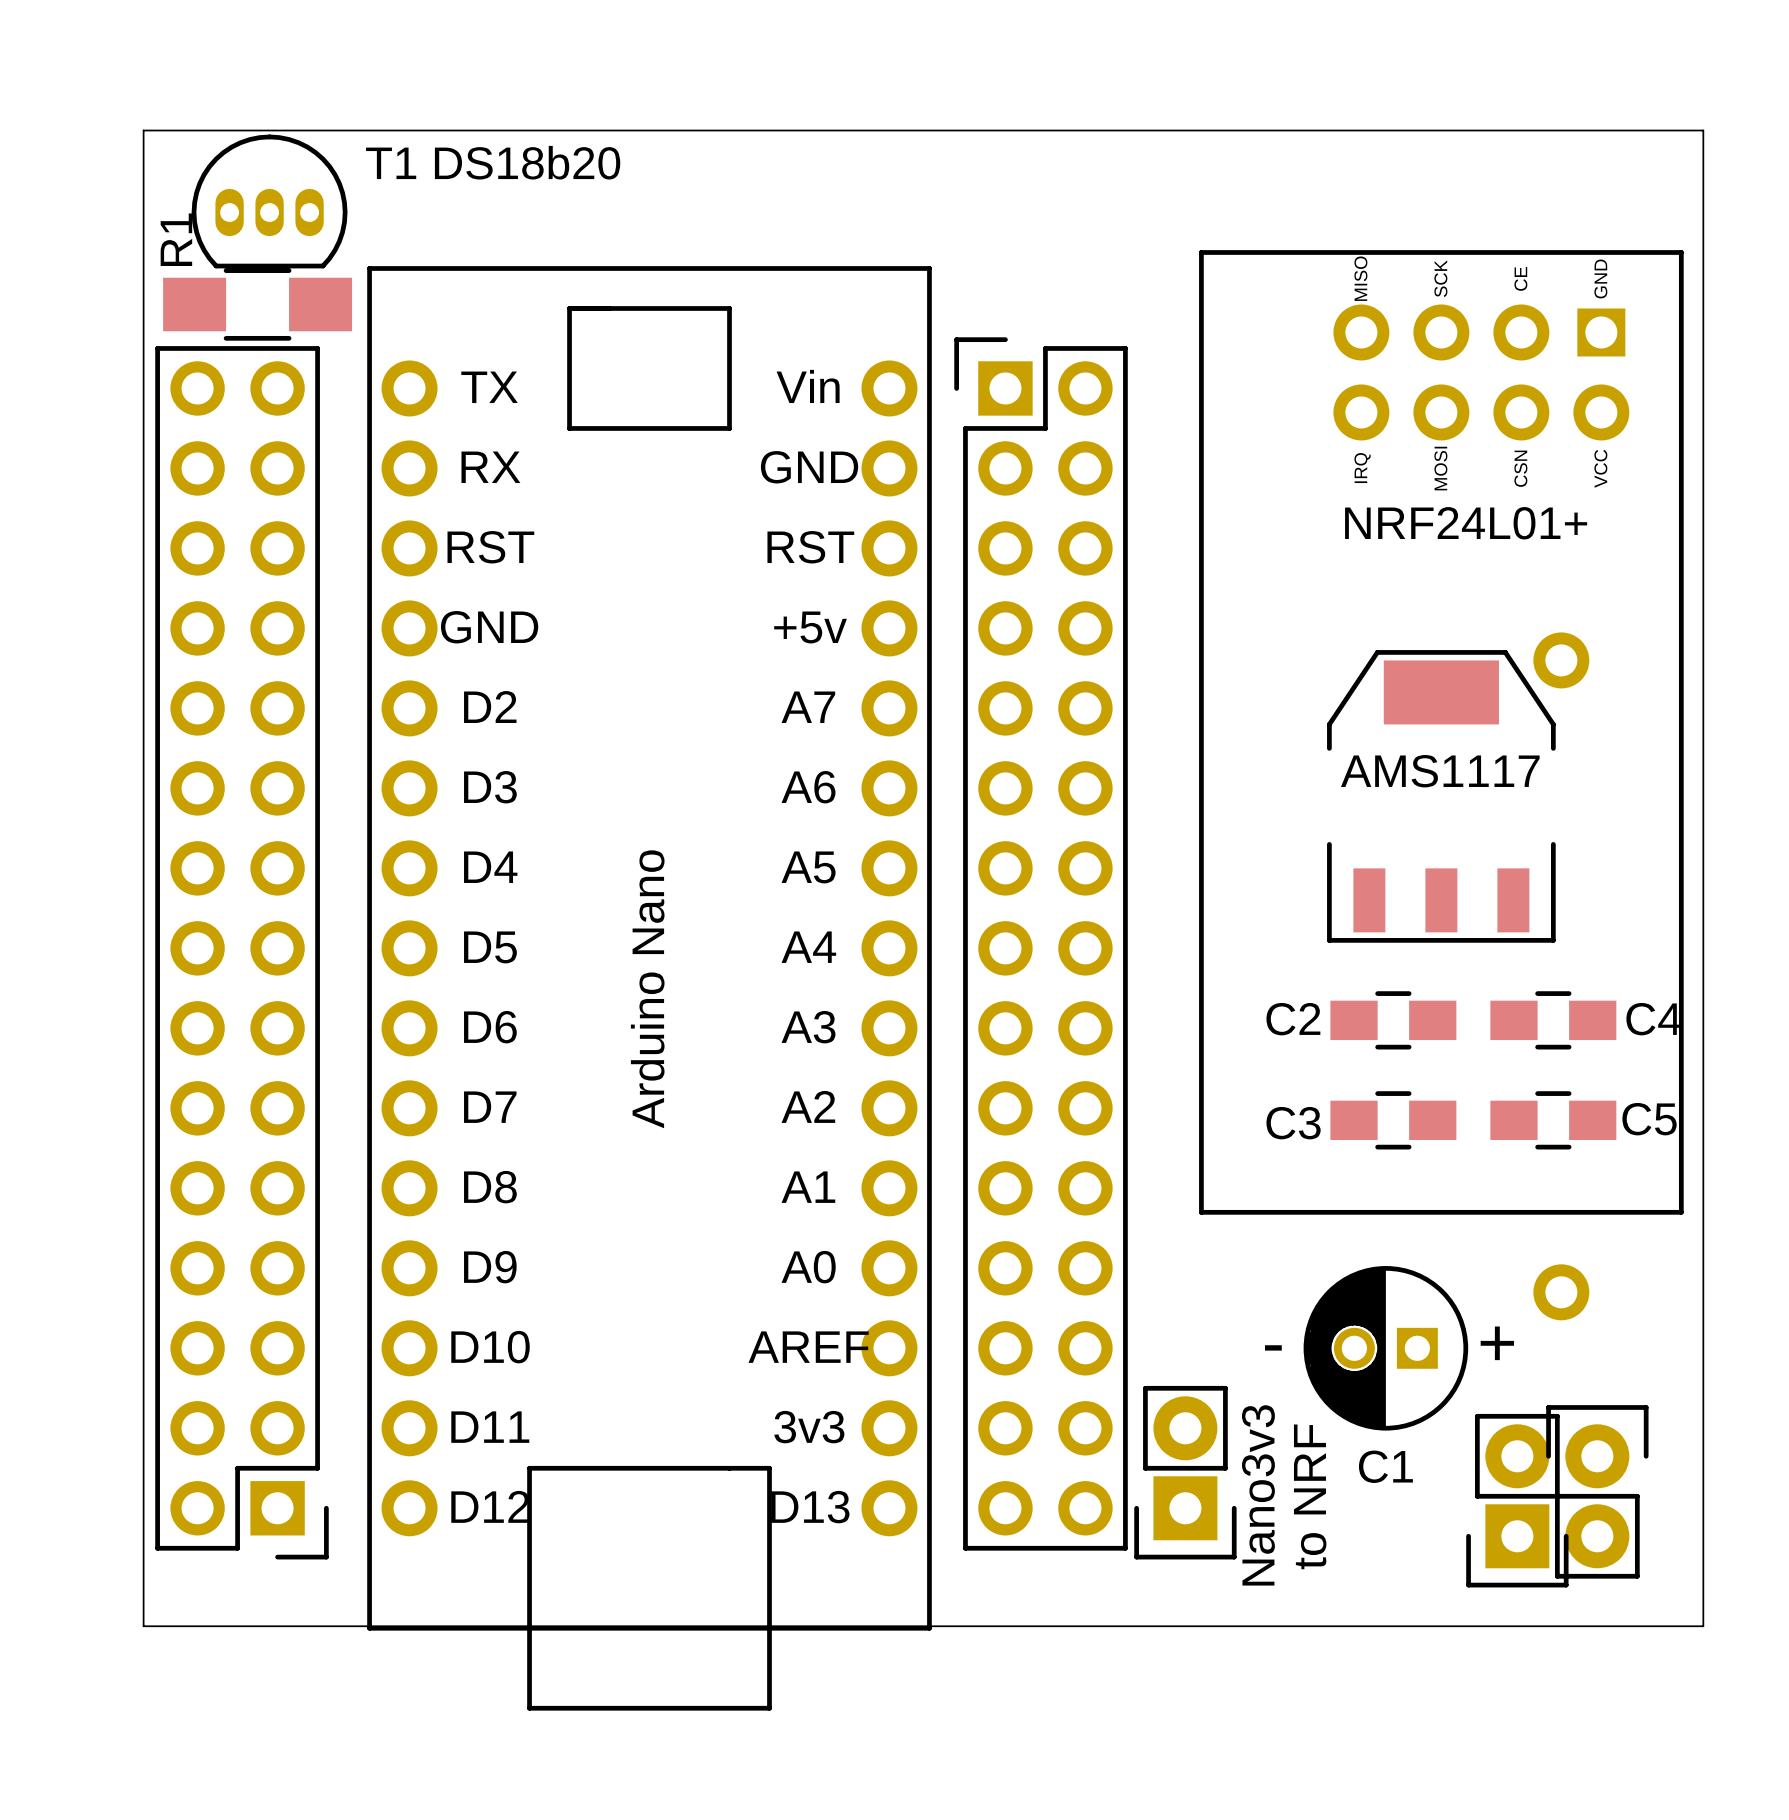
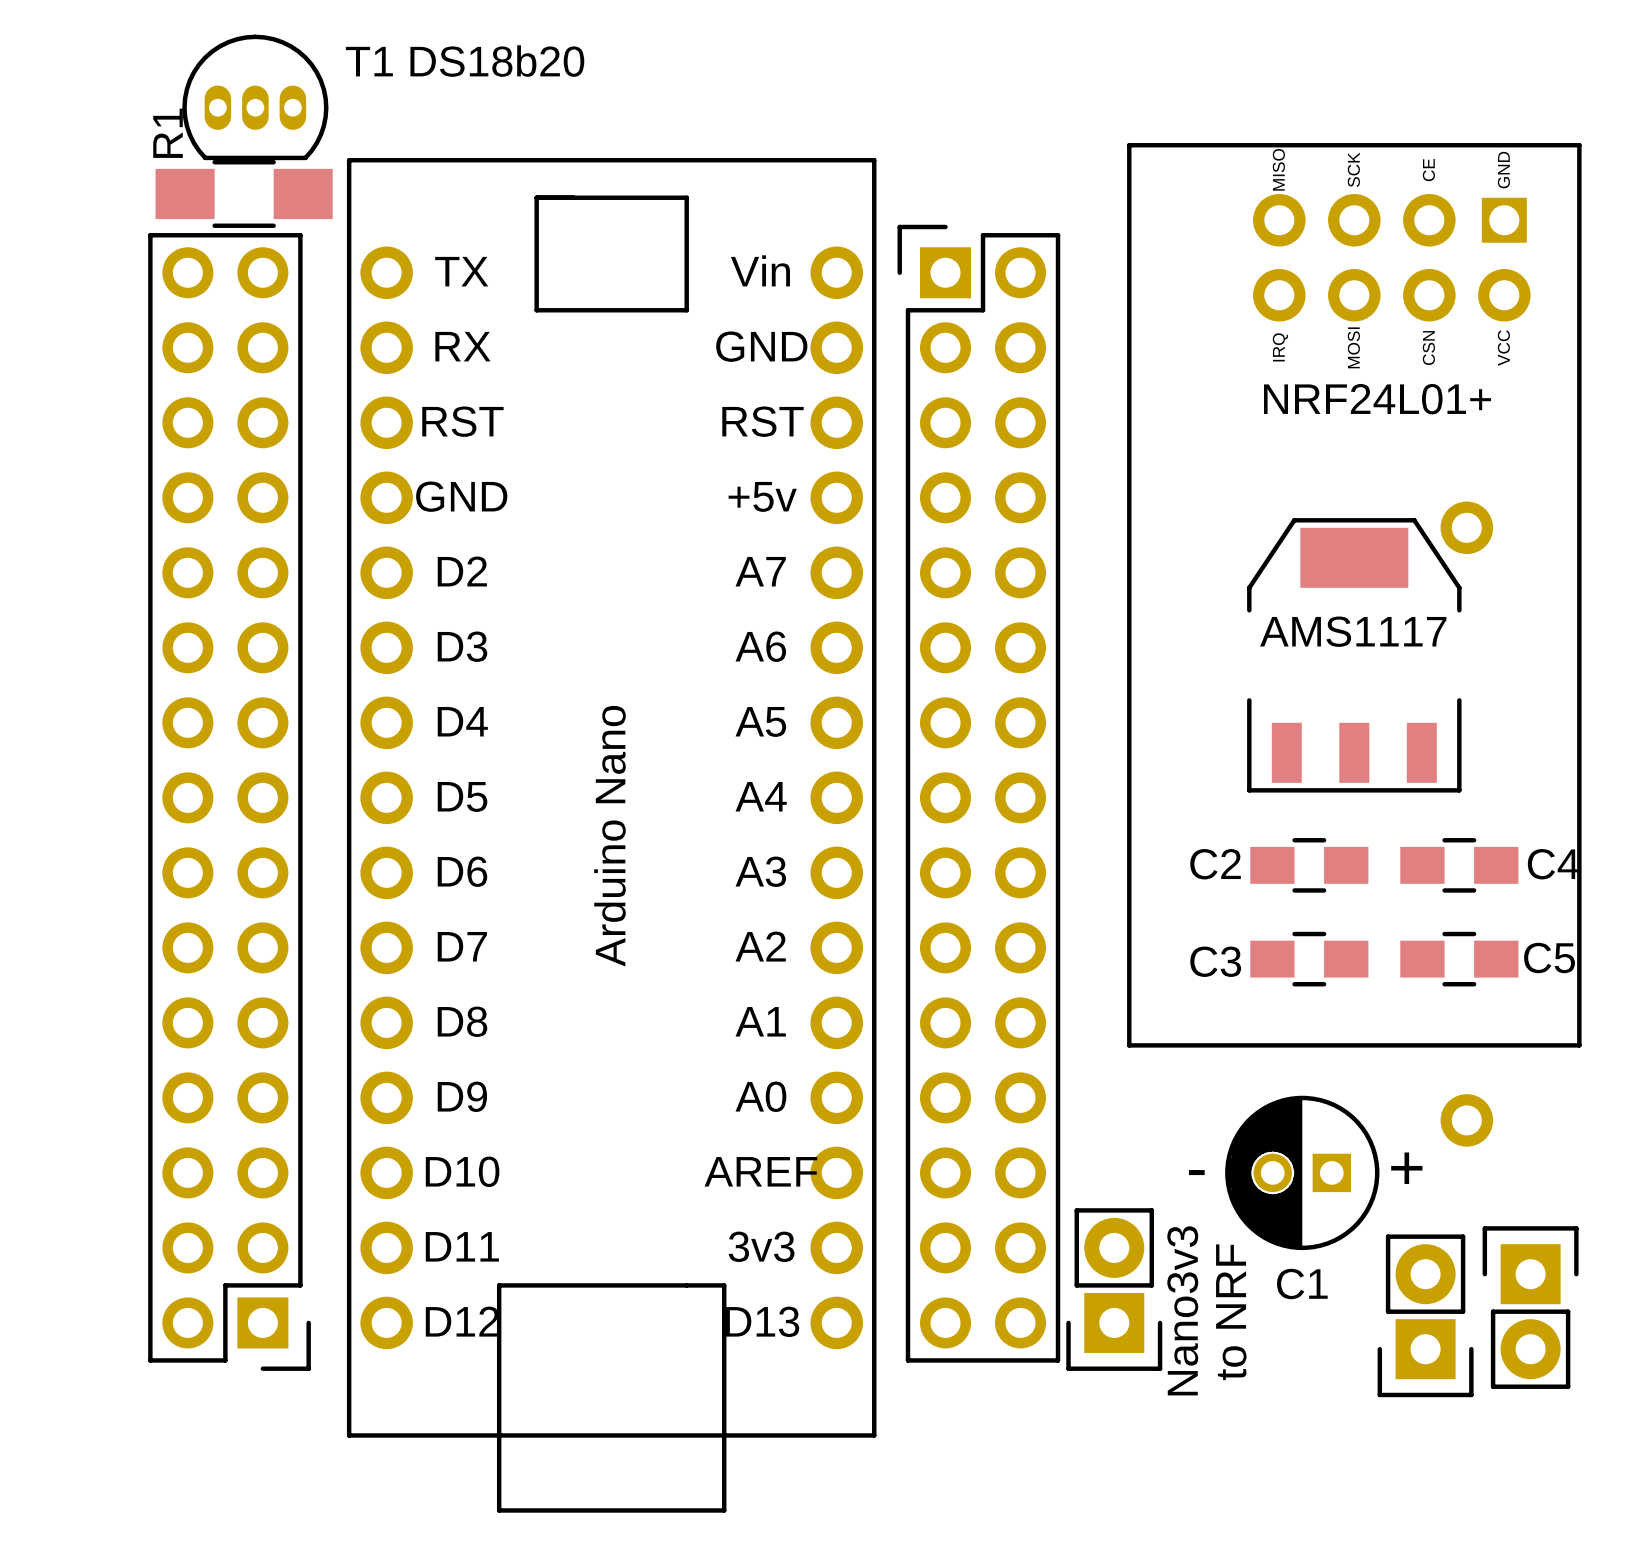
board edge: (143, 130) (1703, 130) (1703, 1626) (143, 1626) (143, 130) -> none
part: (1597, 1491) -> none
part: none -> (1530, 1307)

